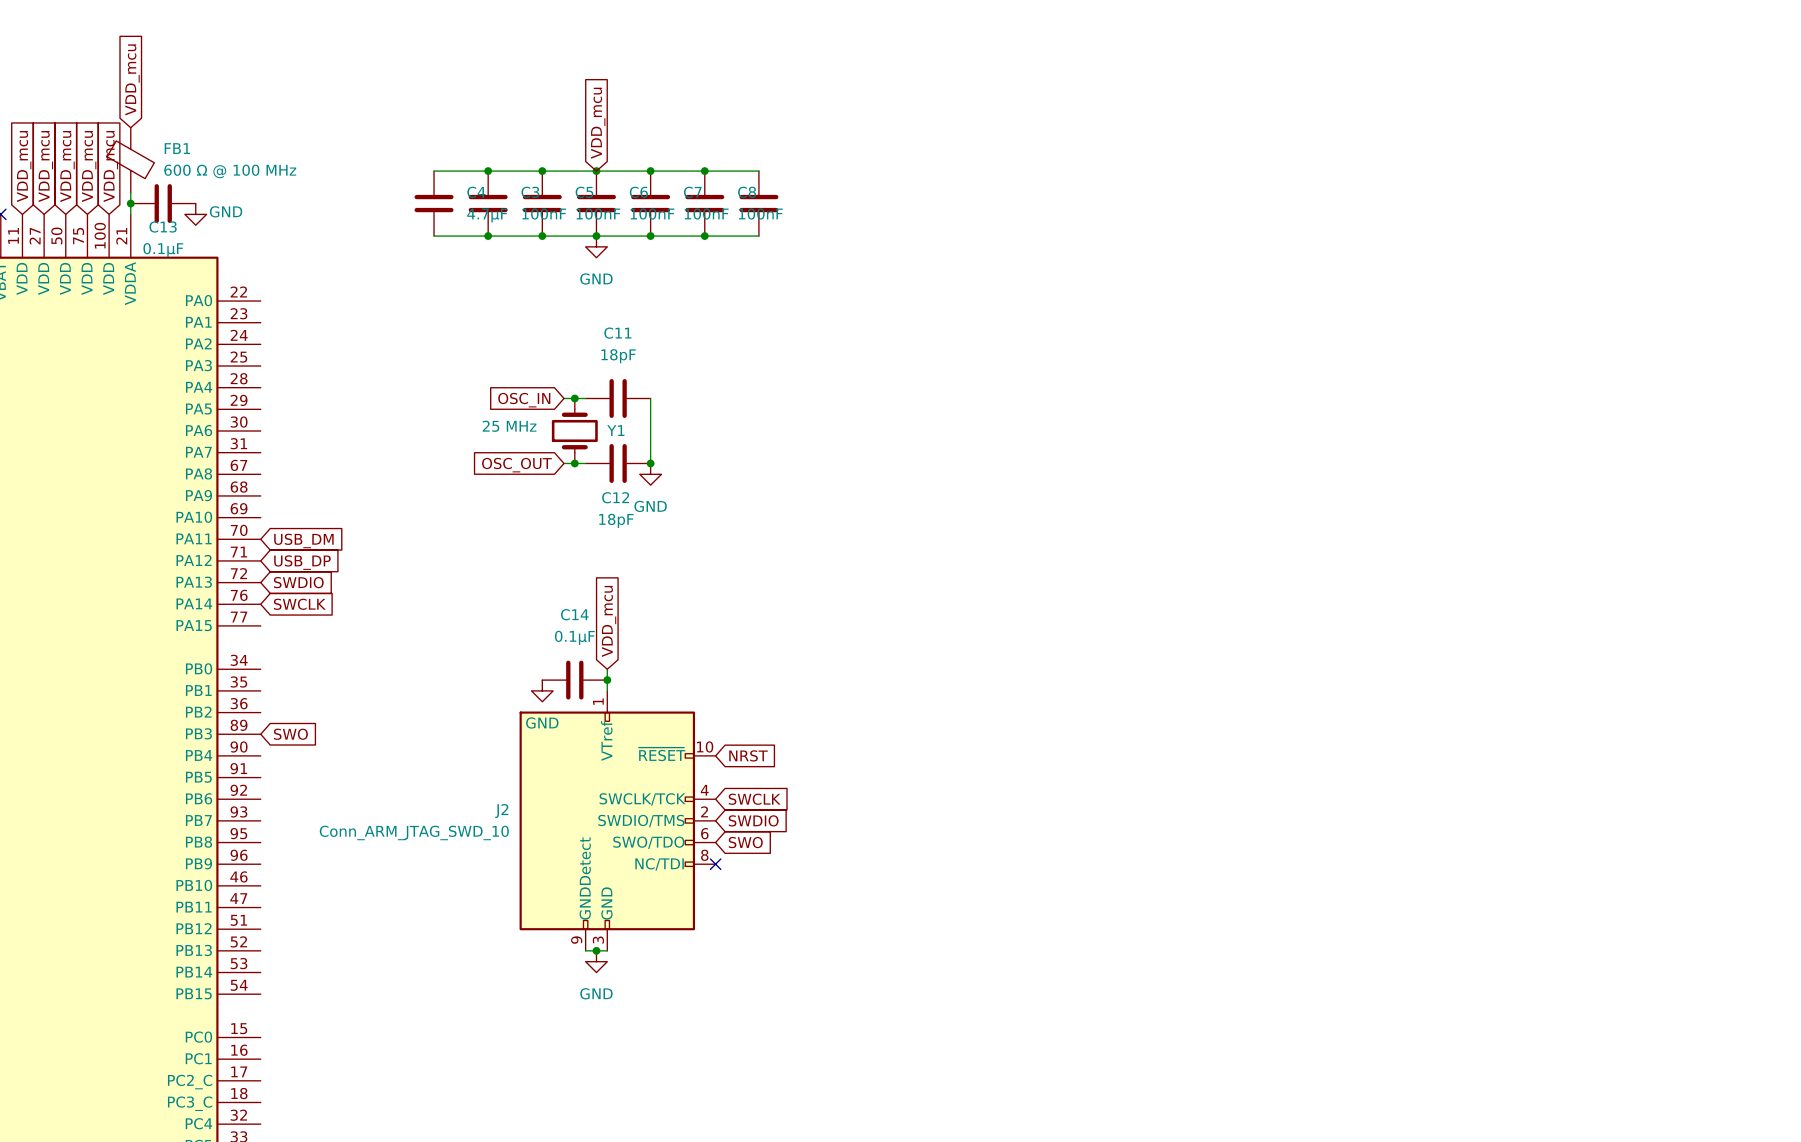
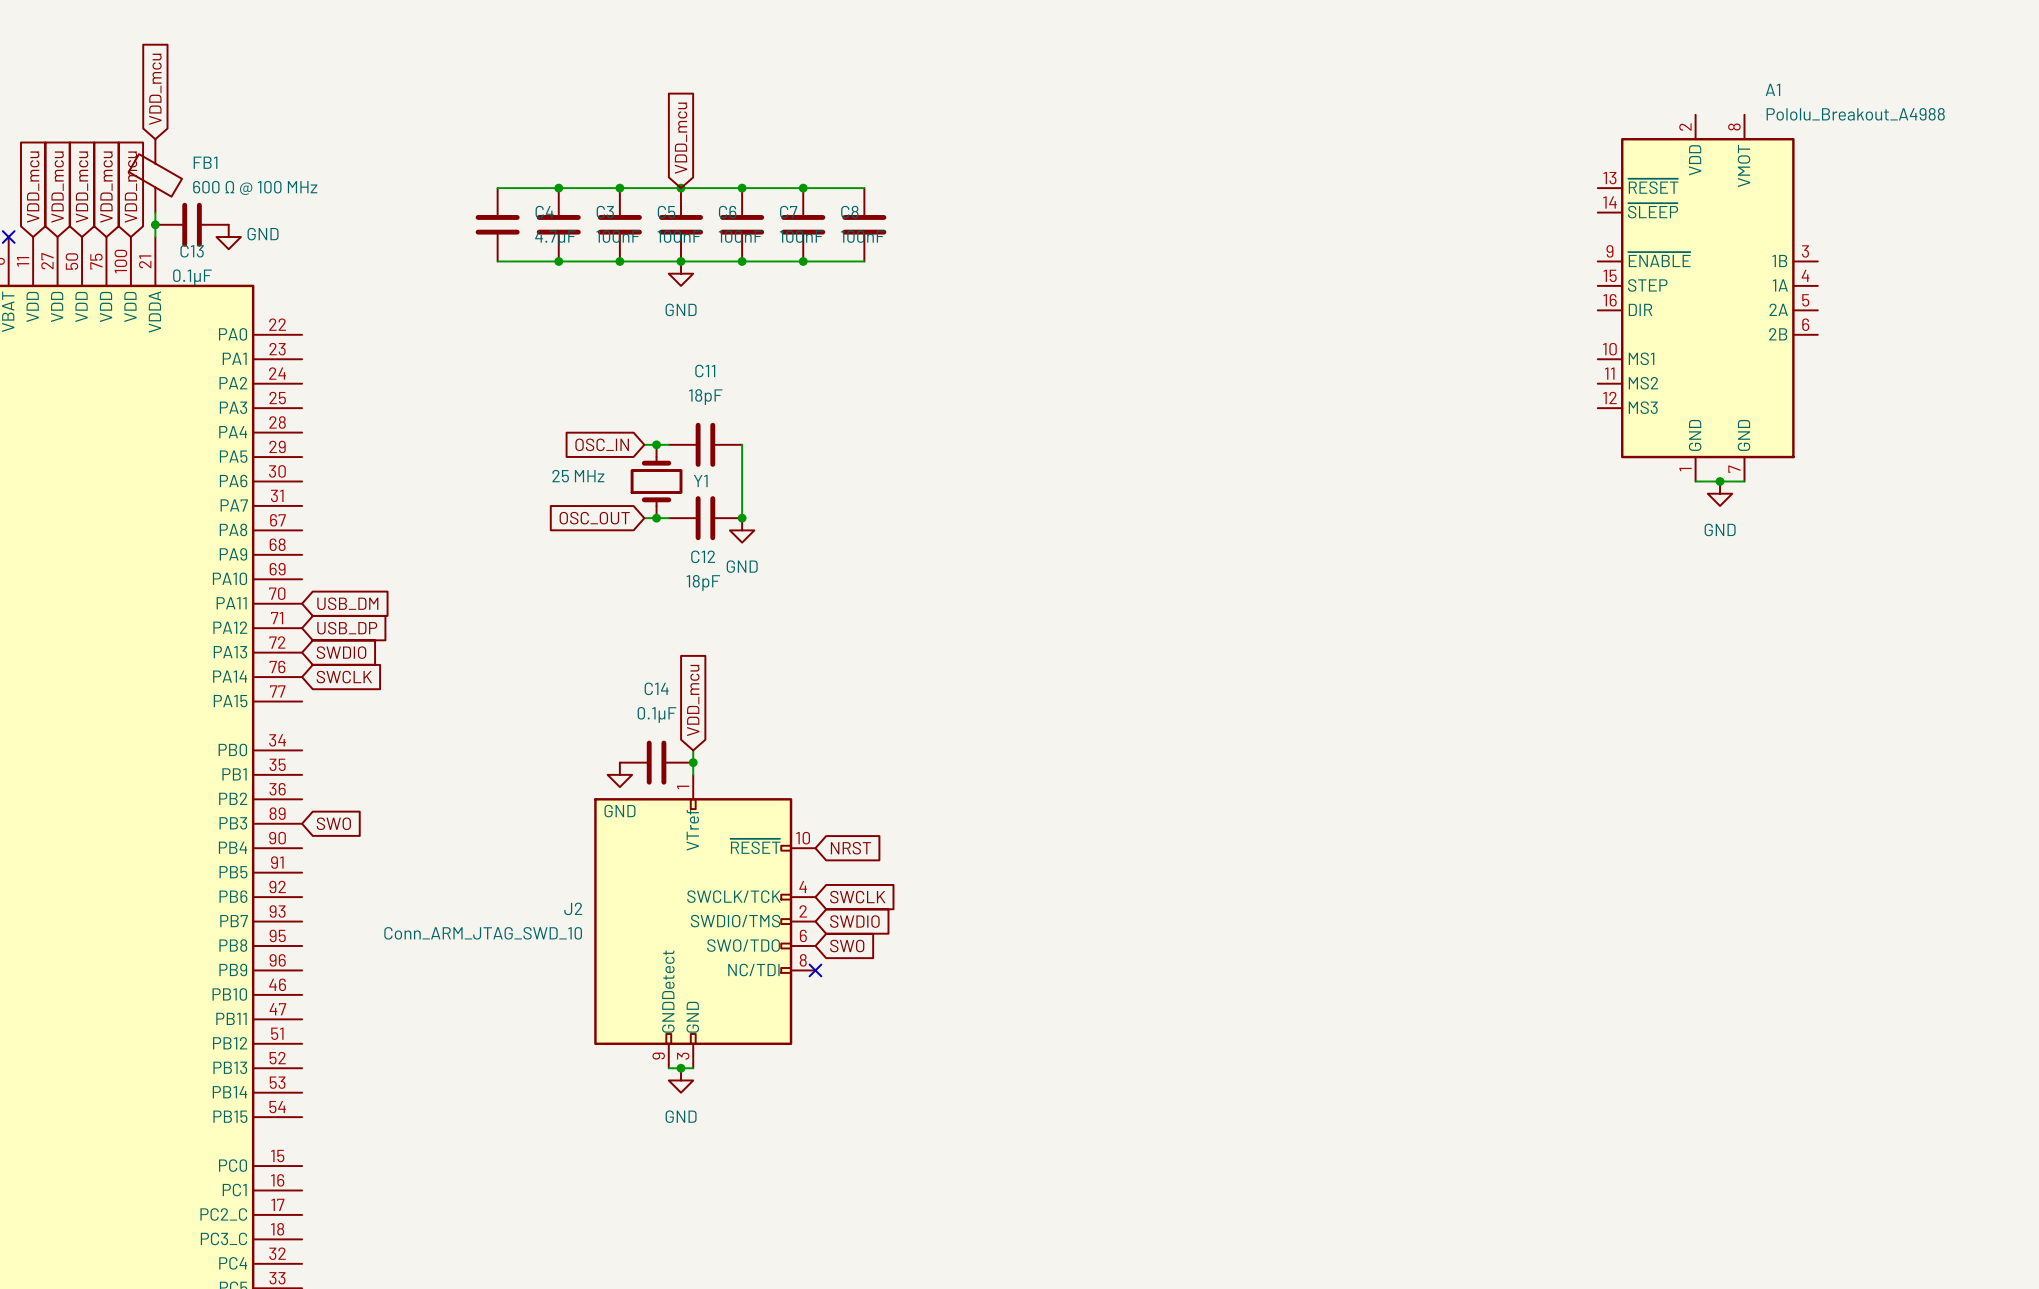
A1: none -> Pololu_Breakout_A4988 (1707, 298)
wire: none -> (1695, 481) (1744, 481)
junction: none -> (1720, 481)
power symbol: none -> GND (1720, 493)

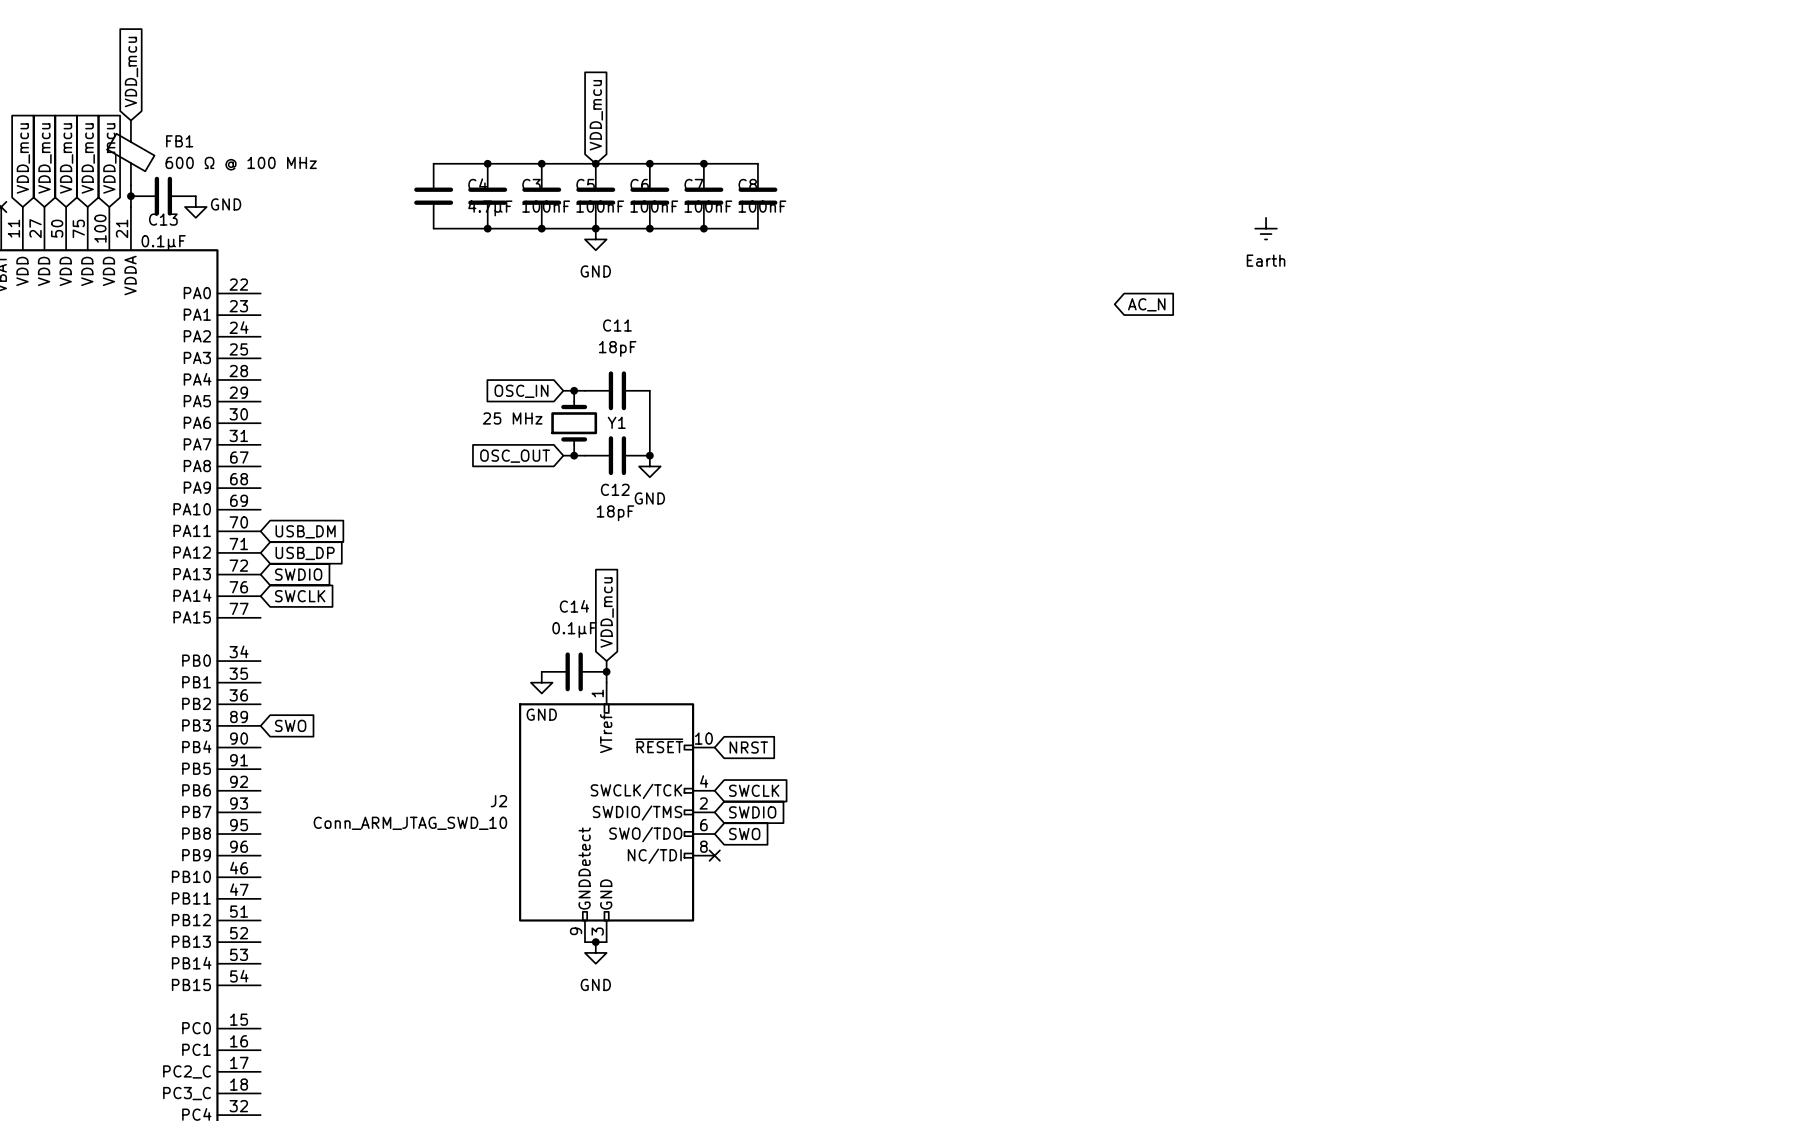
power symbol: none -> Earth (1266, 228)
A1: Pololu_Breakout_A4988 (1707, 298) -> none
global label: none -> AC_N (1146, 304)
wire: (1695, 481) (1744, 481) -> none
junction: (1720, 481) -> none
power symbol: GND (1720, 493) -> none

